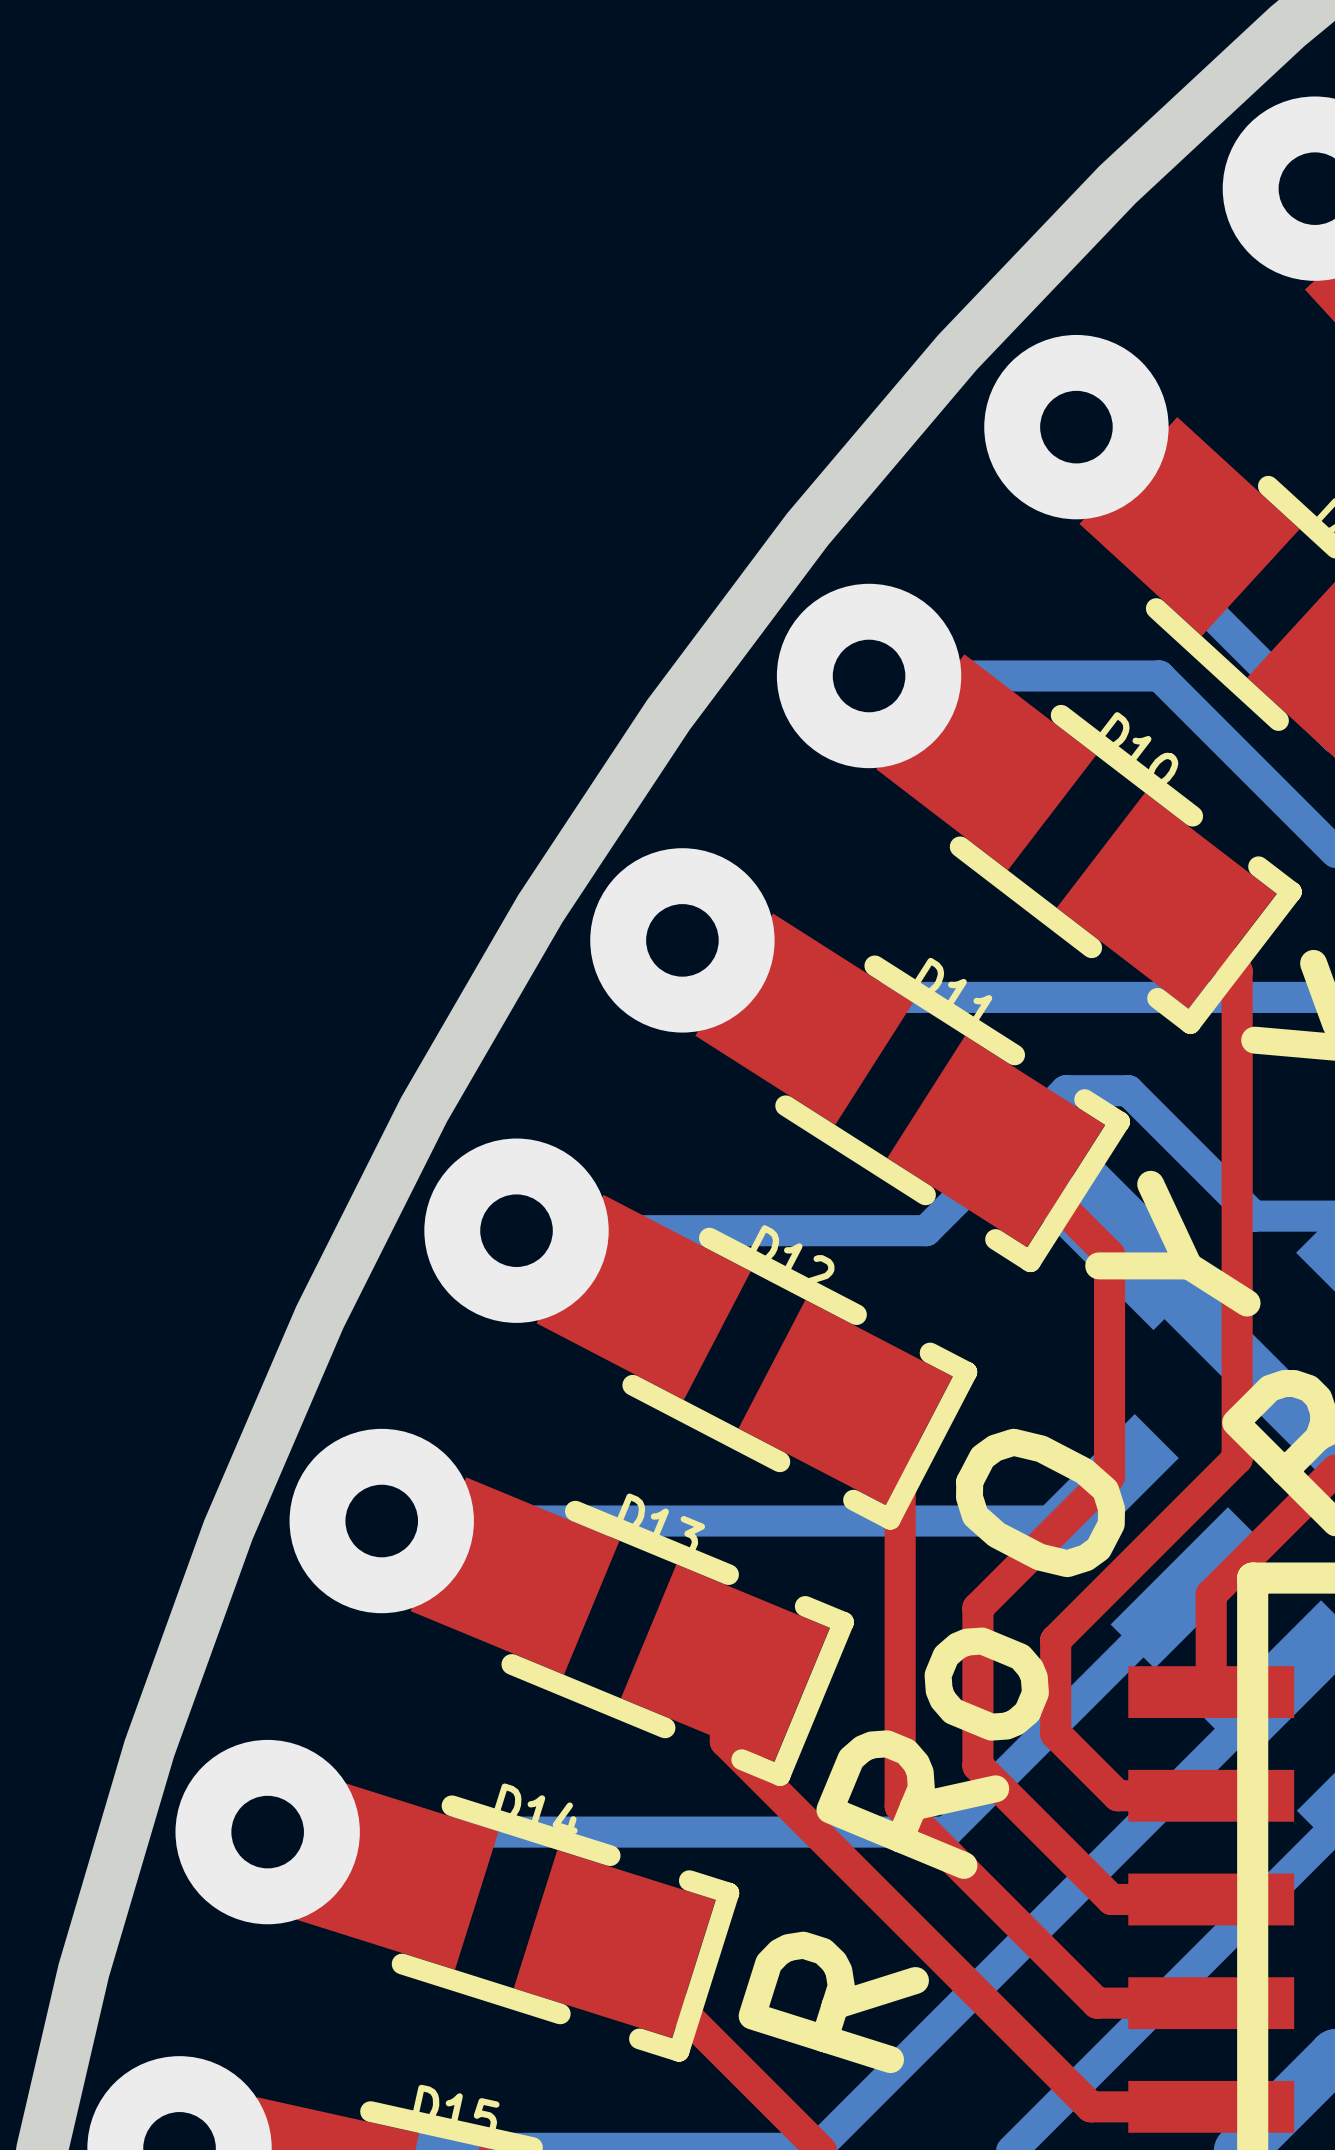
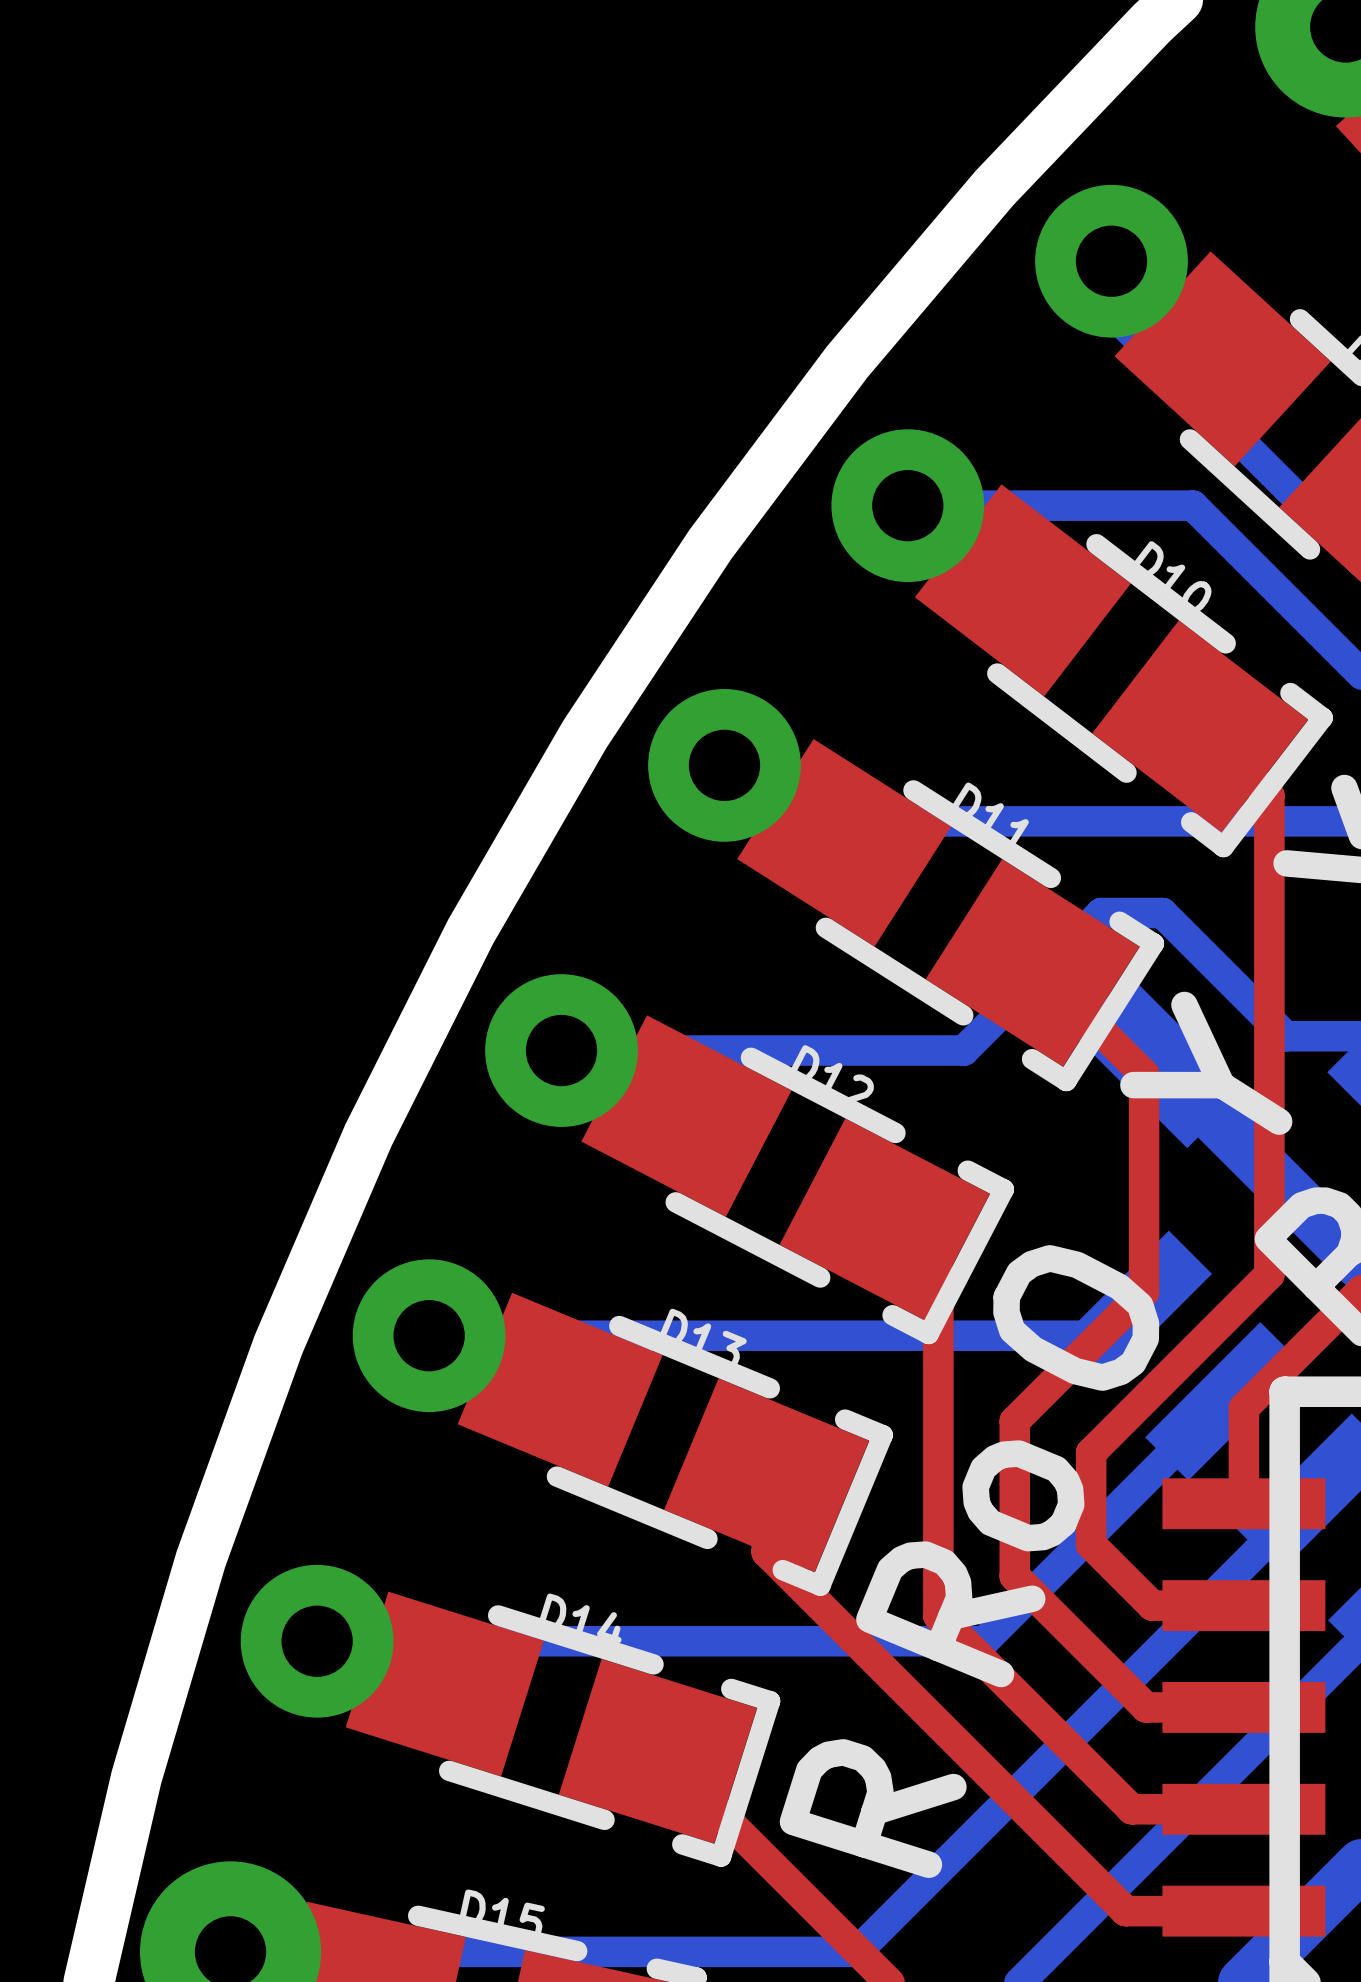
via size: [984, 334, 1169, 520] -> [1035, 184, 1188, 338]
via size: [776, 583, 962, 769] -> [831, 429, 985, 583]
via size: [590, 848, 775, 1033] -> [648, 688, 801, 842]
via size: [424, 1138, 609, 1323] -> [485, 974, 638, 1127]
via size: [289, 1428, 474, 1614] -> [352, 1259, 506, 1413]
via size: [175, 1739, 360, 1925] -> [240, 1564, 394, 1718]

